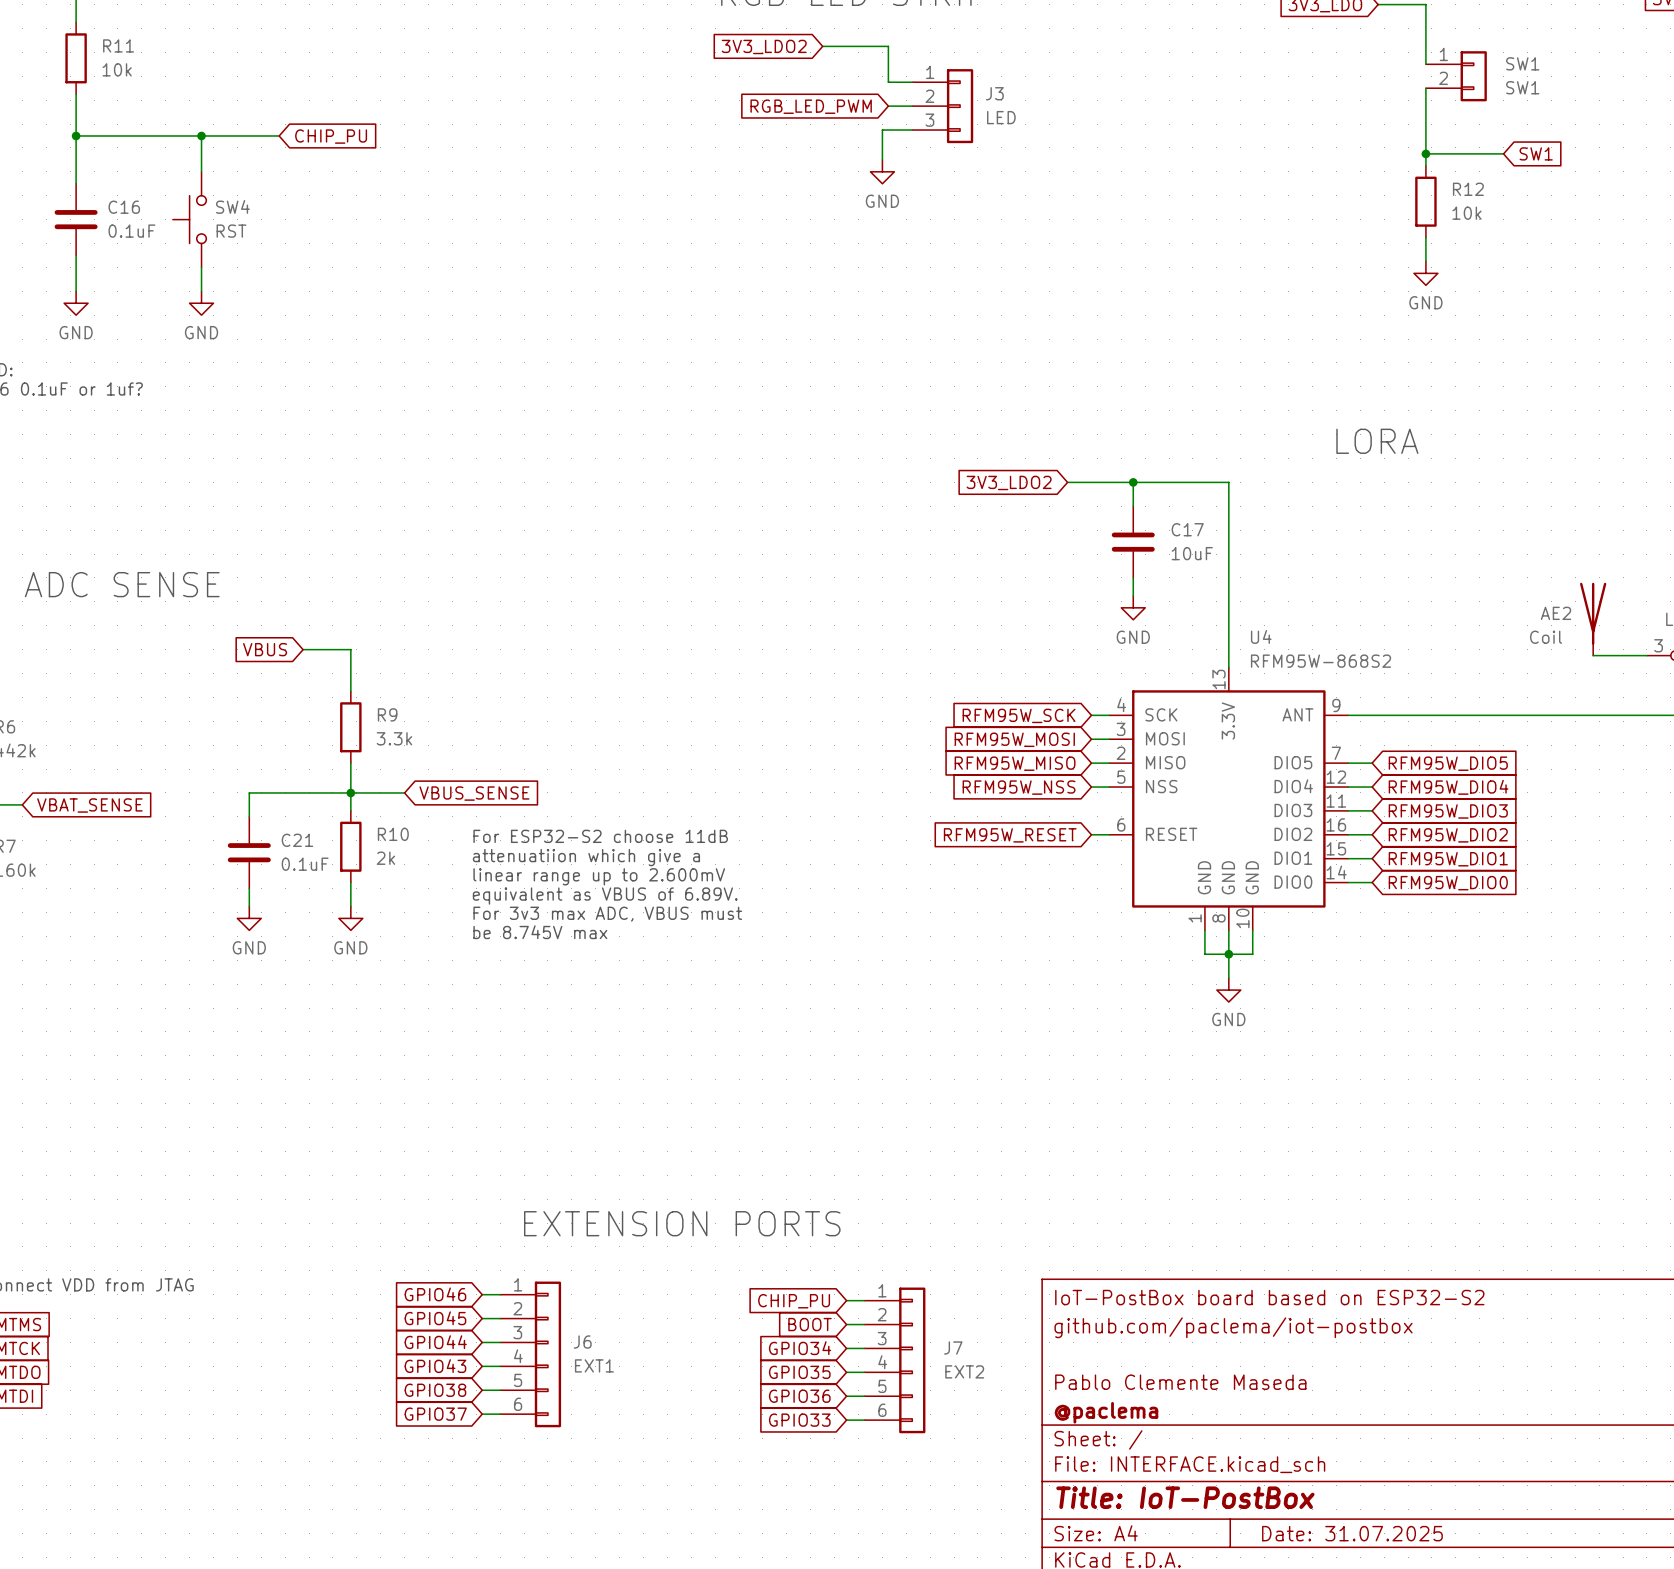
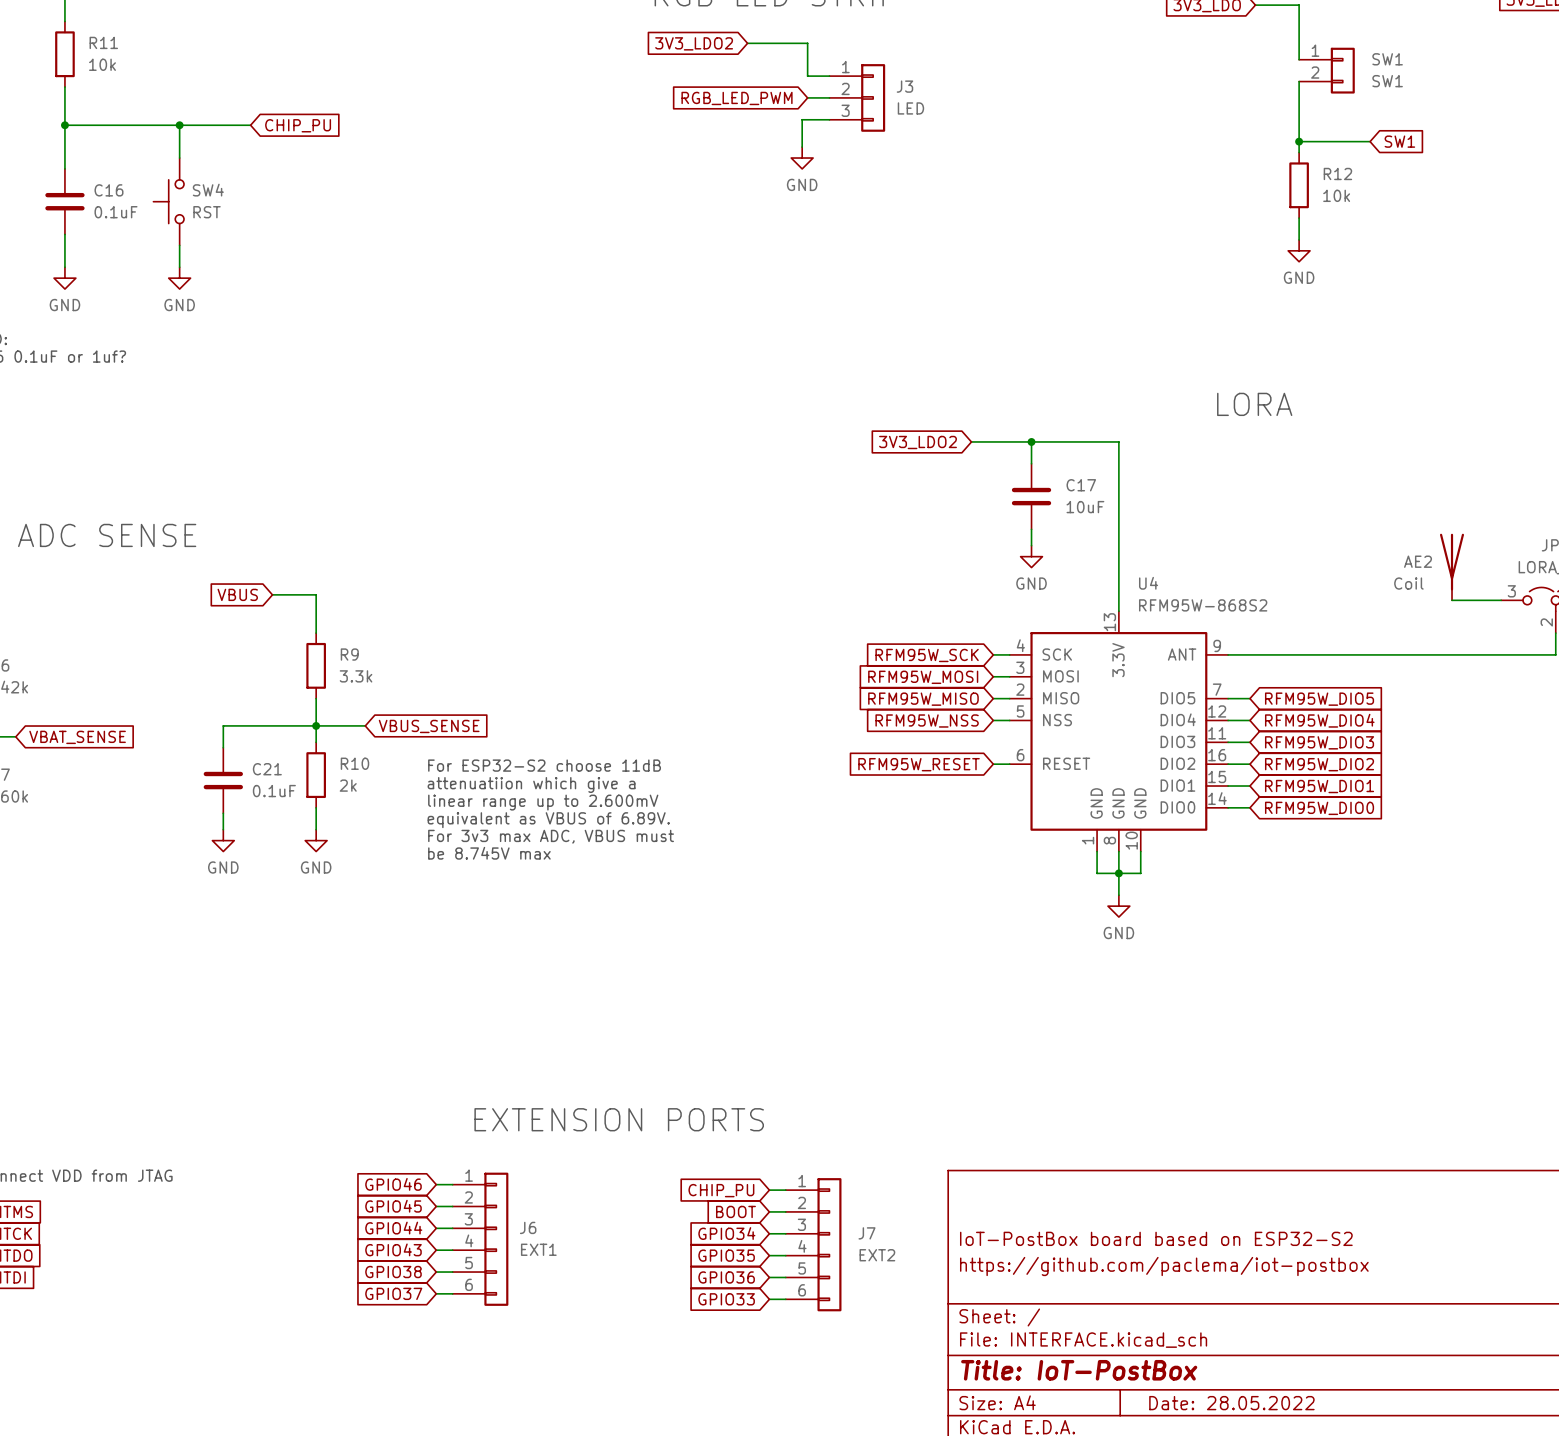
title block position: IoT-PostBox board based on ESP32-S2 (1269, 1297) -> IoT-PostBox board based on ESP32-S2 (1156, 1238)
title block: github.com/paclema/iot-postbox (1233, 1327) -> none
title block: Pablo Clemente Maseda (1180, 1382) -> https://github.com/paclema/iot-postbox (1164, 1266)
title block: @paclema (1106, 1412) -> none
title block: Date: 31.07.2025 (1352, 1533) -> Date: 28.05.2022 (1231, 1403)

